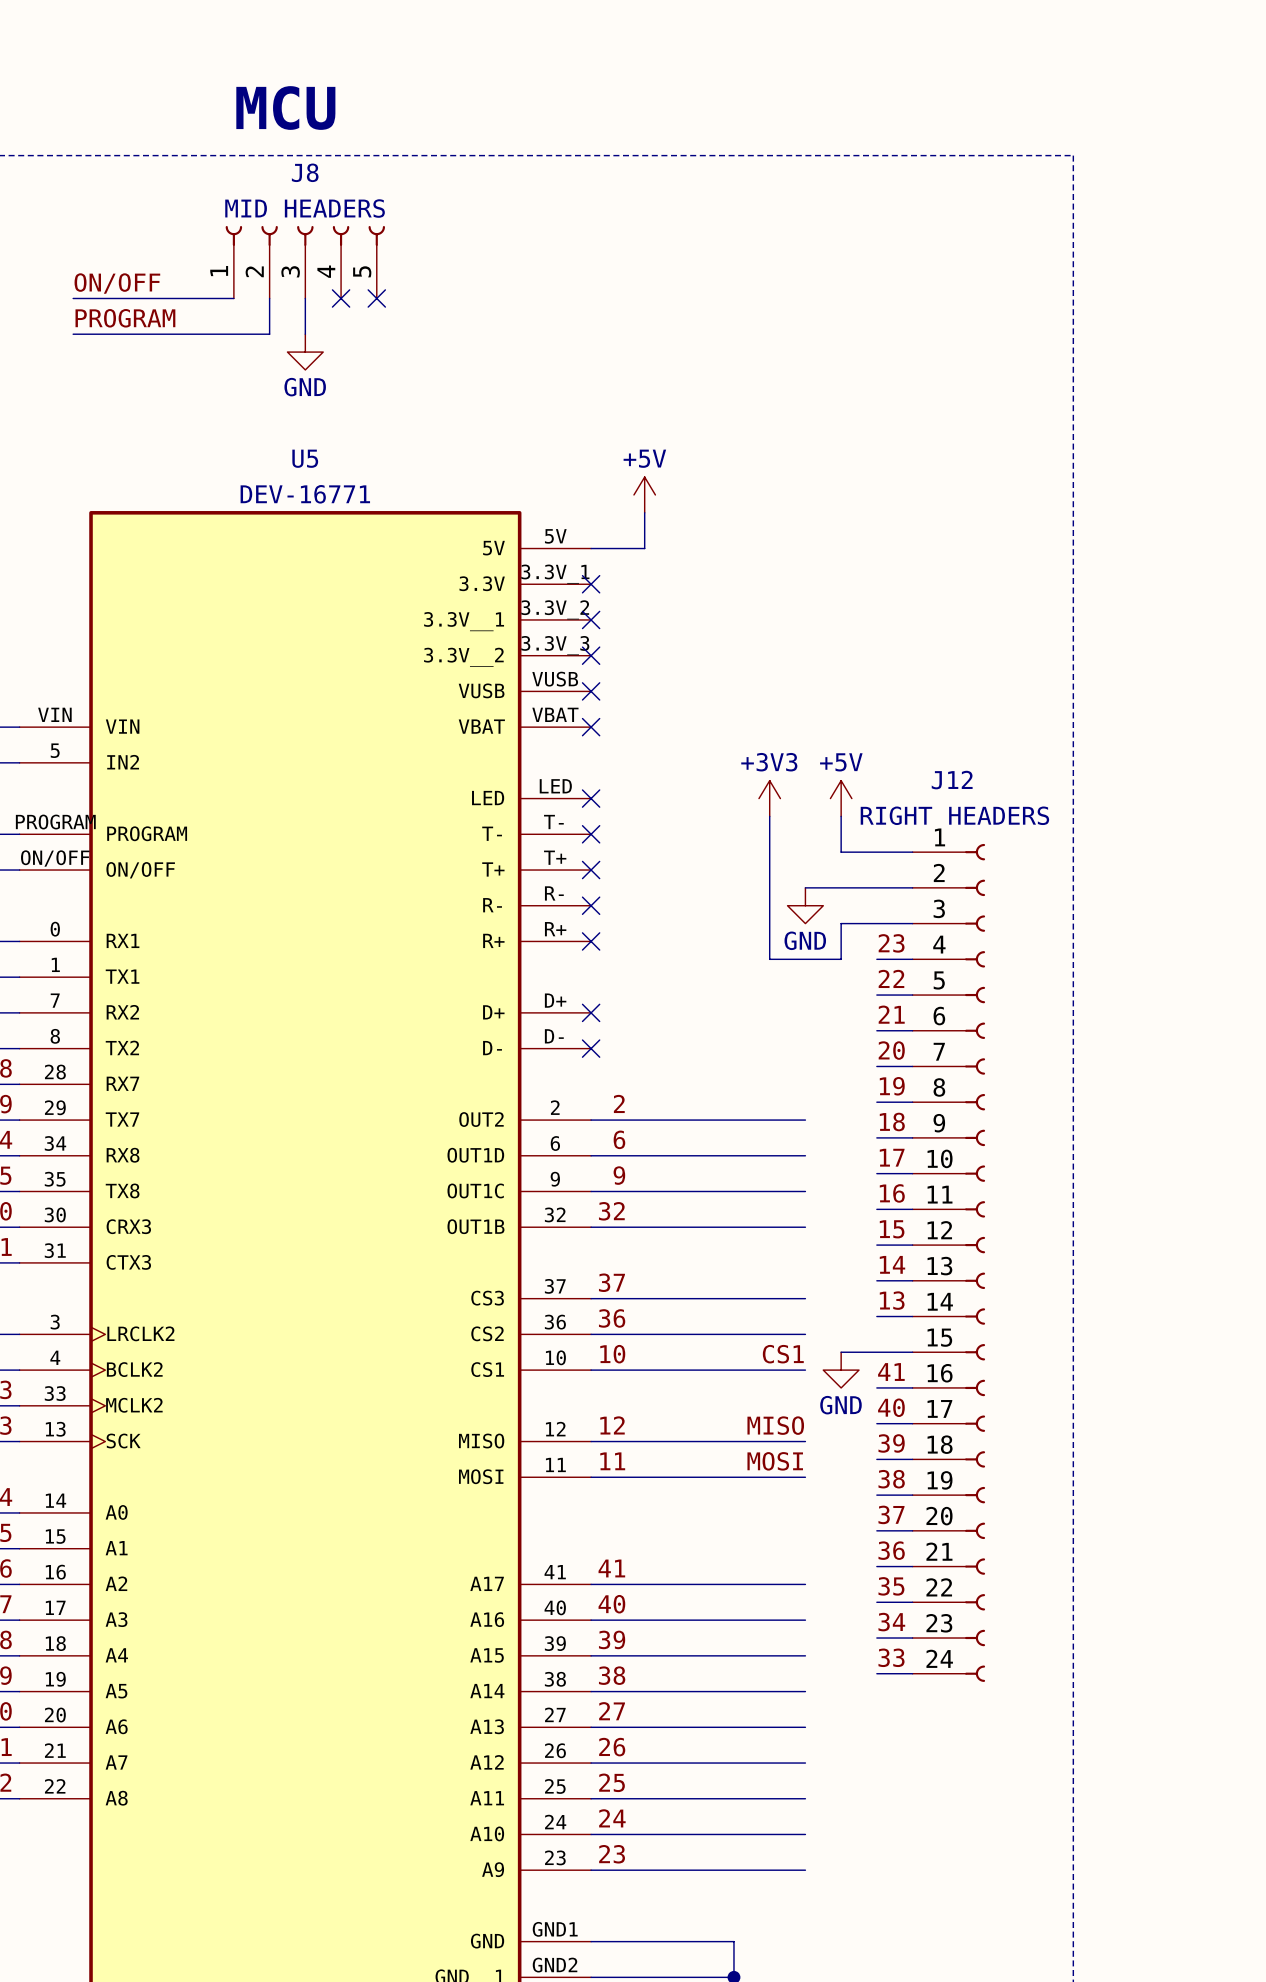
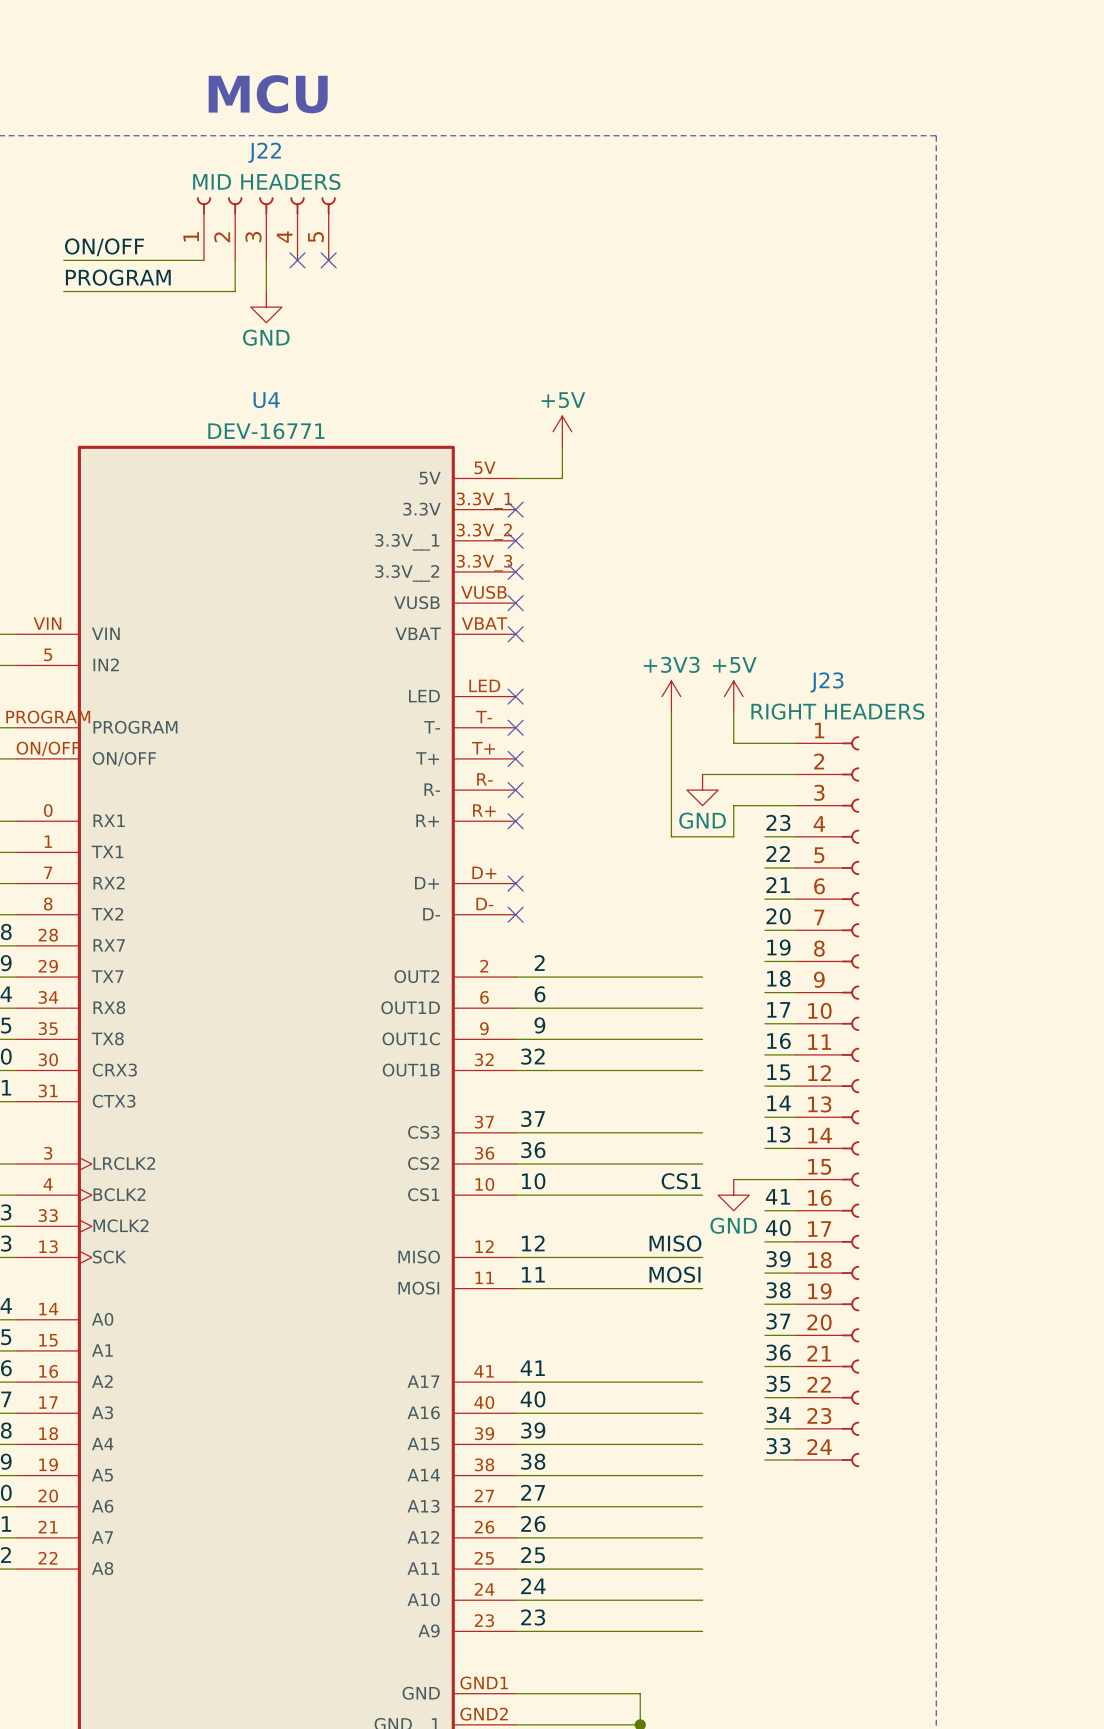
J8 name: J8 (305, 172) -> J22 (264, 152)
U5 name: U5 (305, 458) -> U4 (266, 400)
J12 name: J12 (952, 780) -> J23 (826, 682)

